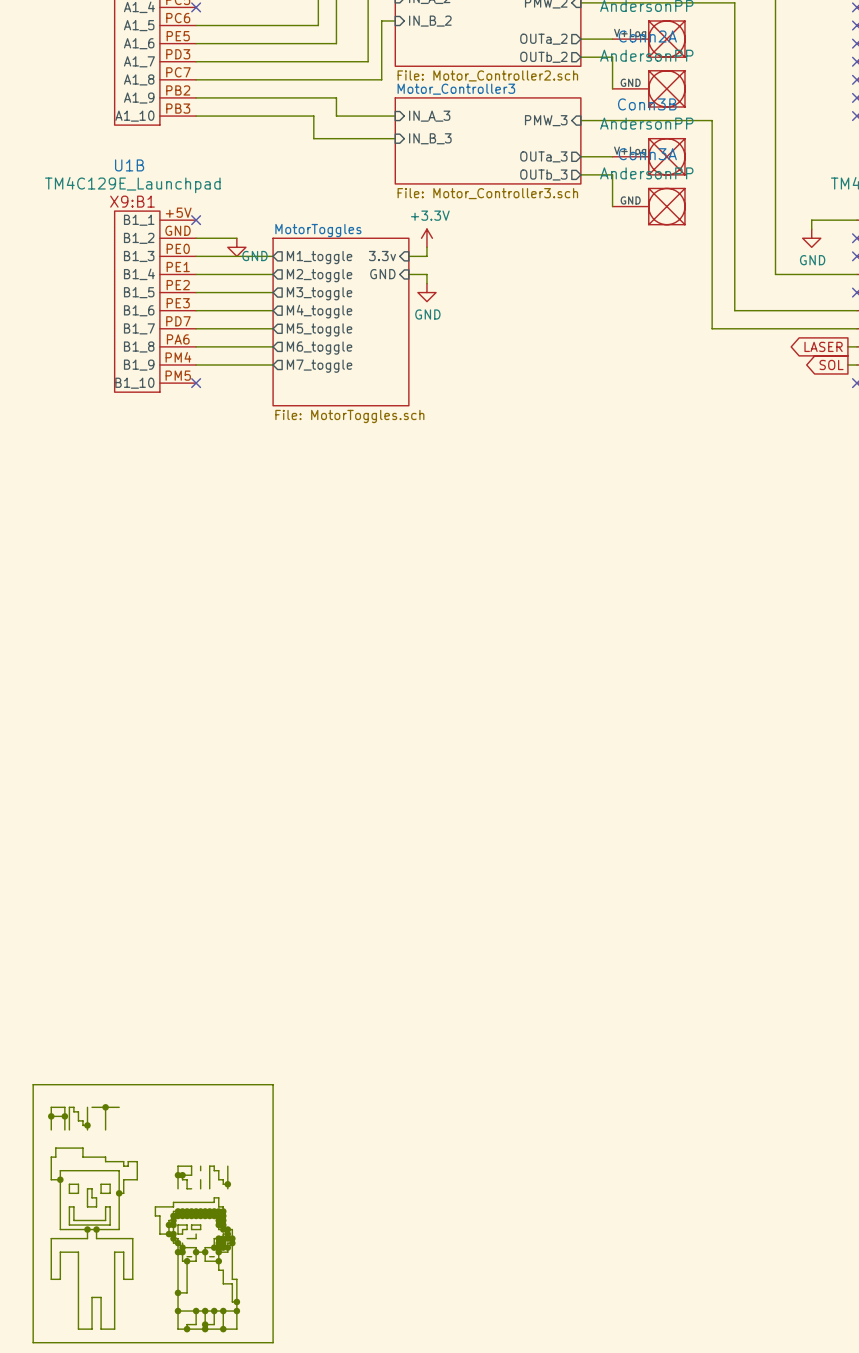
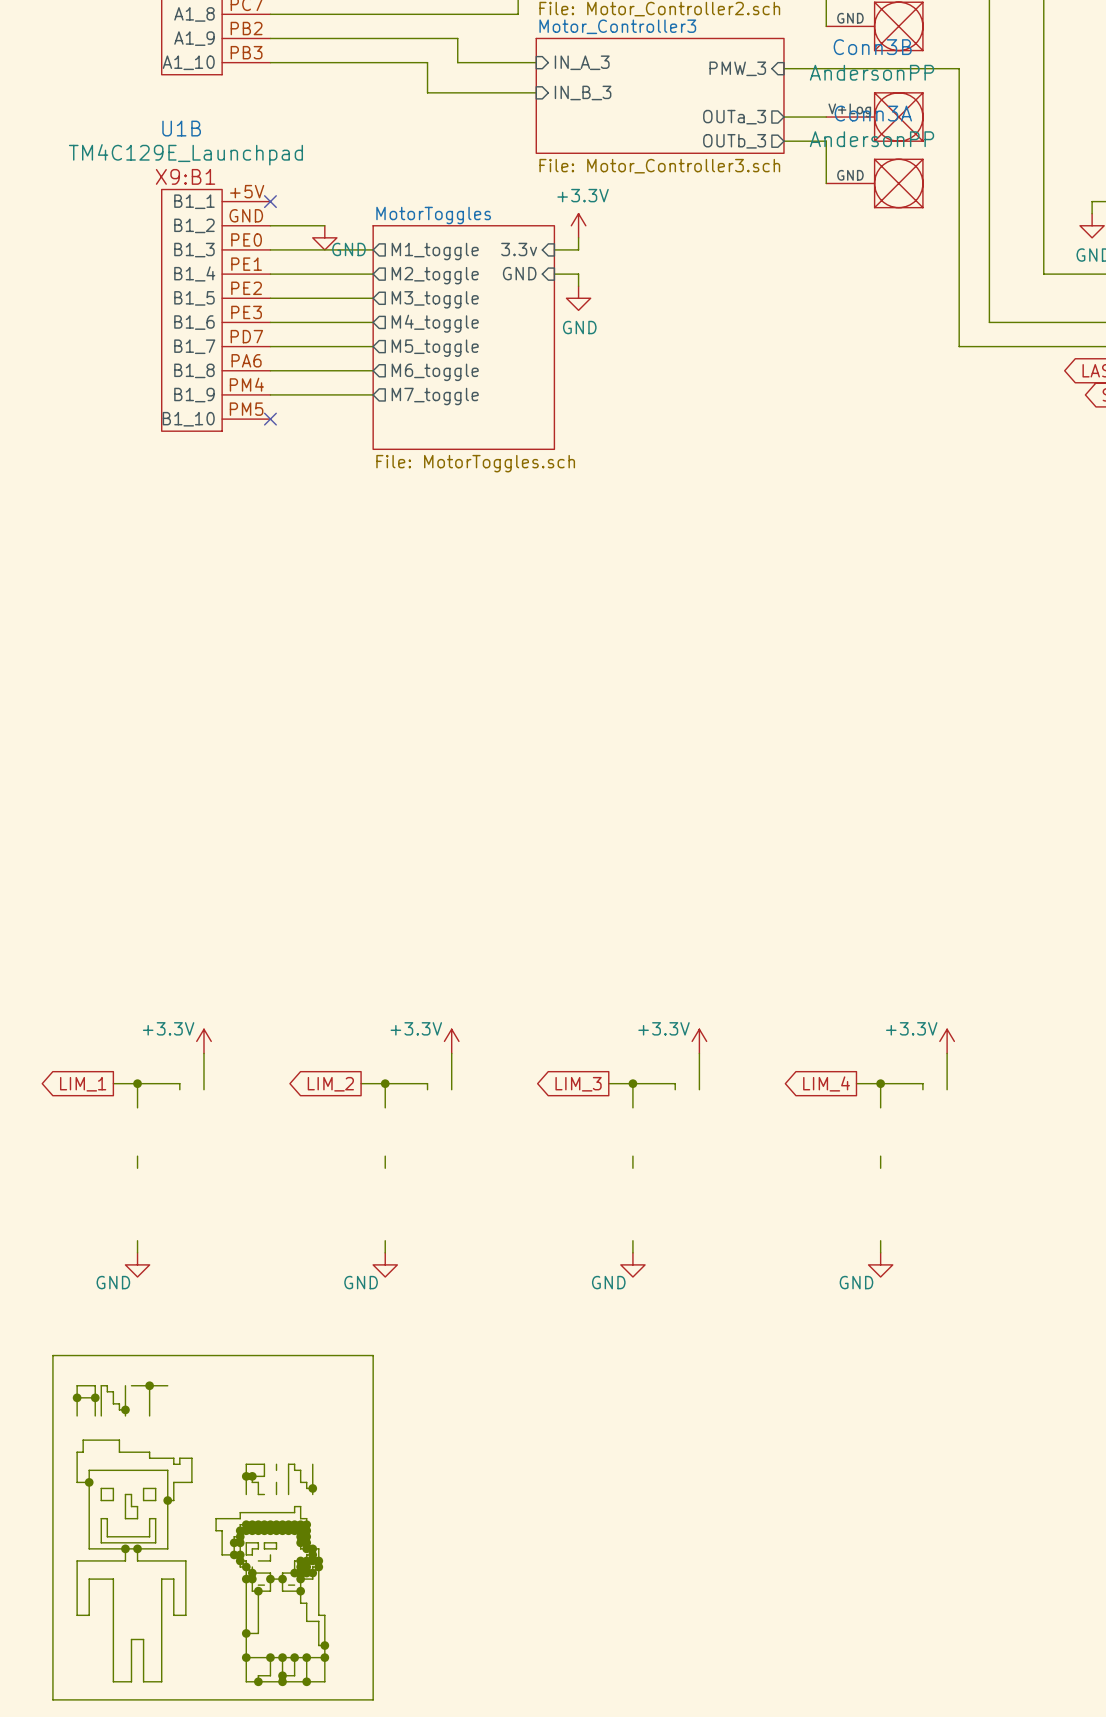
power symbol: none -> +3.3V (203, 1041)
power symbol: none -> +3.3V (451, 1041)
power symbol: none -> +3.3V (699, 1041)
power symbol: none -> +3.3V (947, 1041)
wire: none -> (203, 1053) (203, 1089)
wire: none -> (451, 1053) (451, 1089)
wire: none -> (699, 1053) (699, 1089)
wire: none -> (947, 1053) (947, 1089)
global label: none -> LIM_1 (83, 1084)
wire: none -> (113, 1083) (179, 1083) (179, 1089)
wire: none -> (137, 1083) (137, 1107)
junction: none -> (137, 1083)
global label: none -> LIM_2 (330, 1084)
wire: none -> (361, 1083) (427, 1083) (427, 1089)
wire: none -> (385, 1083) (385, 1107)
junction: none -> (385, 1083)
global label: none -> LIM_3 (578, 1084)
wire: none -> (608, 1083) (675, 1083) (675, 1089)
wire: none -> (632, 1083) (632, 1107)
junction: none -> (632, 1083)
global label: none -> LIM_4 (826, 1083)
wire: none -> (856, 1083) (922, 1083) (922, 1089)
wire: none -> (880, 1083) (880, 1107)
junction: none -> (880, 1083)
wire: none -> (137, 1156) (137, 1168)
wire: none -> (385, 1156) (385, 1168)
wire: none -> (632, 1156) (632, 1168)
wire: none -> (880, 1156) (880, 1168)
wire: none -> (137, 1240) (137, 1252)
wire: none -> (385, 1240) (385, 1252)
wire: none -> (632, 1240) (632, 1252)
wire: none -> (880, 1240) (880, 1252)
power symbol: none -> GND (137, 1264)
power symbol: none -> GND (385, 1264)
power symbol: none -> GND (632, 1264)
power symbol: none -> GND (880, 1264)

